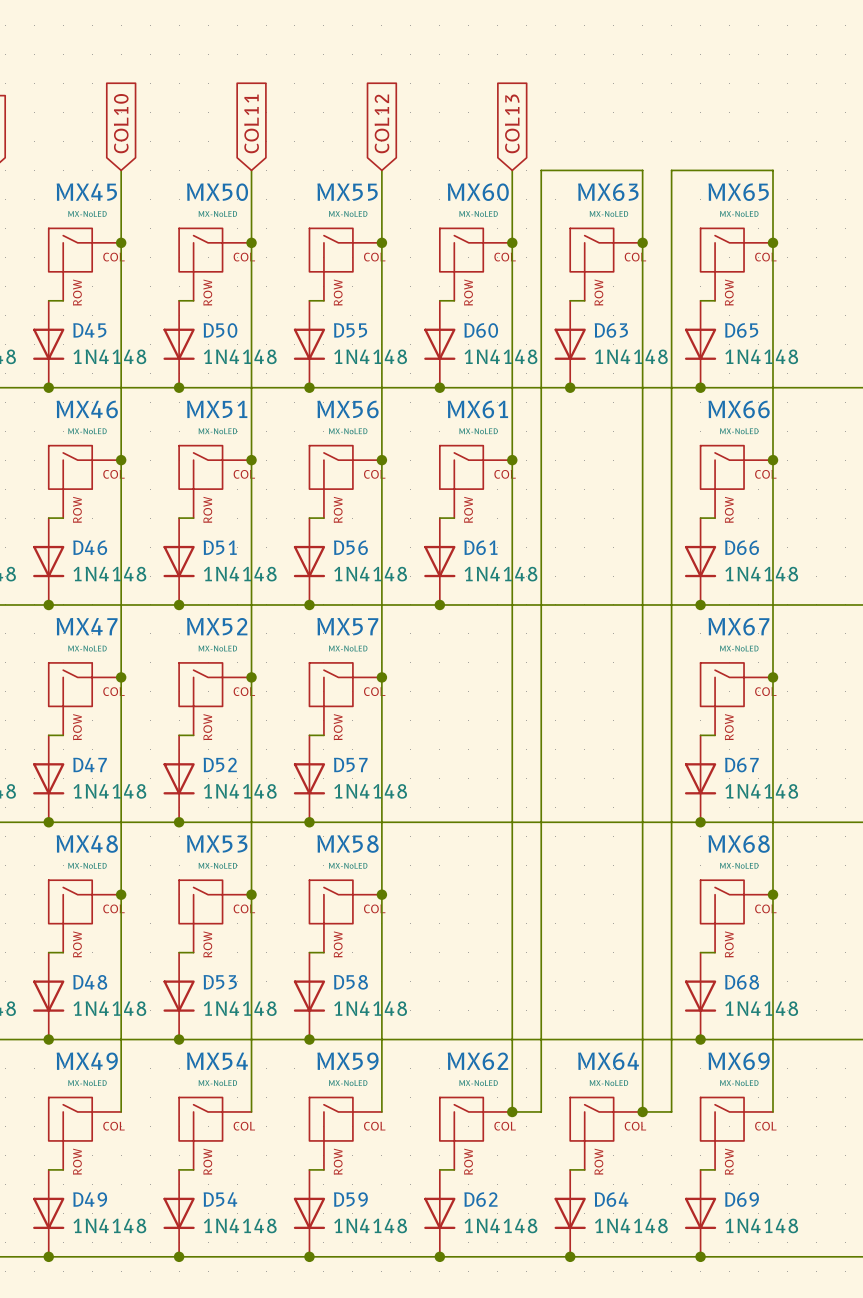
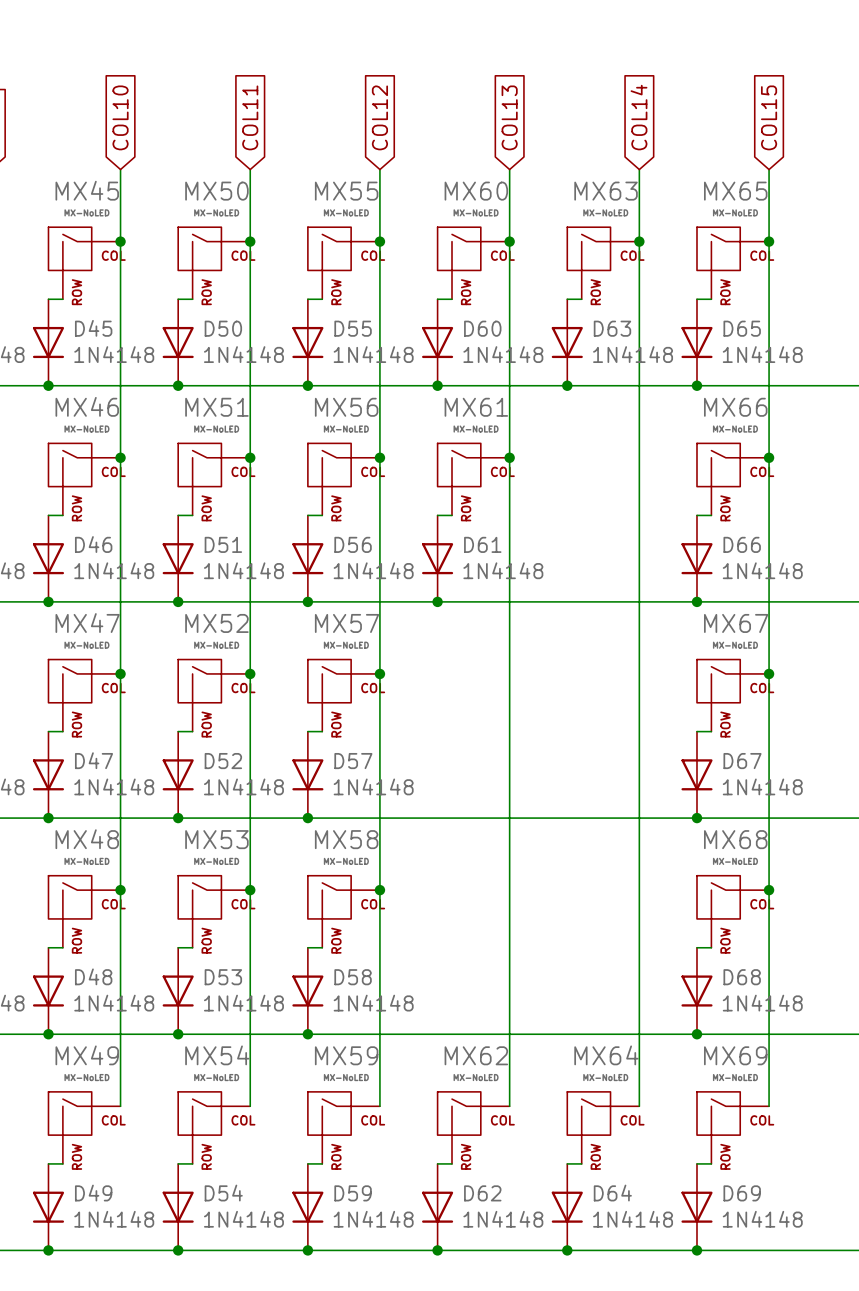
global label: none -> COL14 (639, 117)
global label: none -> COL15 (769, 117)
wire: (642, 170) (541, 170) (541, 1111) (512, 1111) -> none
wire: (772, 170) (671, 170) (671, 1111) (642, 1111) -> none
junction: (512, 1111) -> none
junction: (642, 1111) -> none

